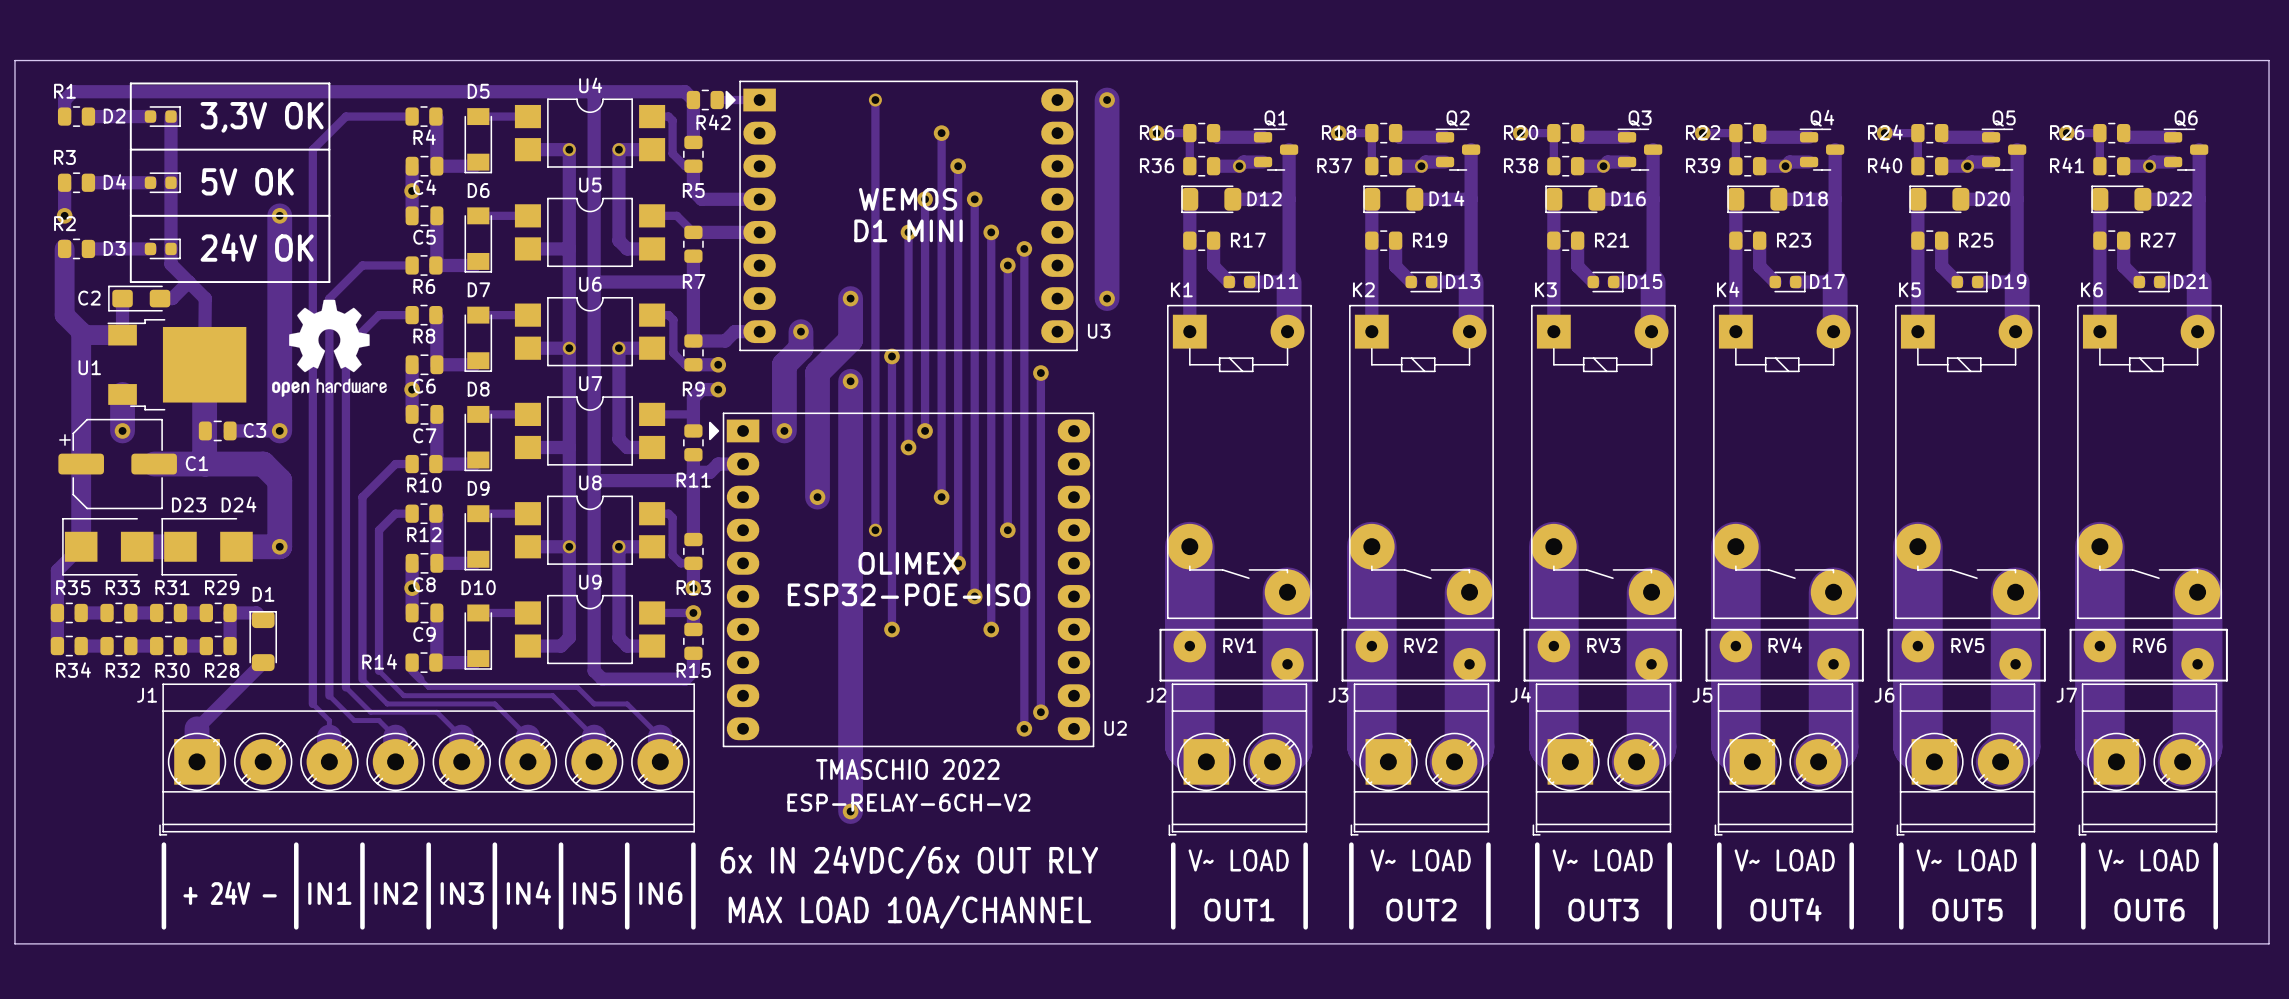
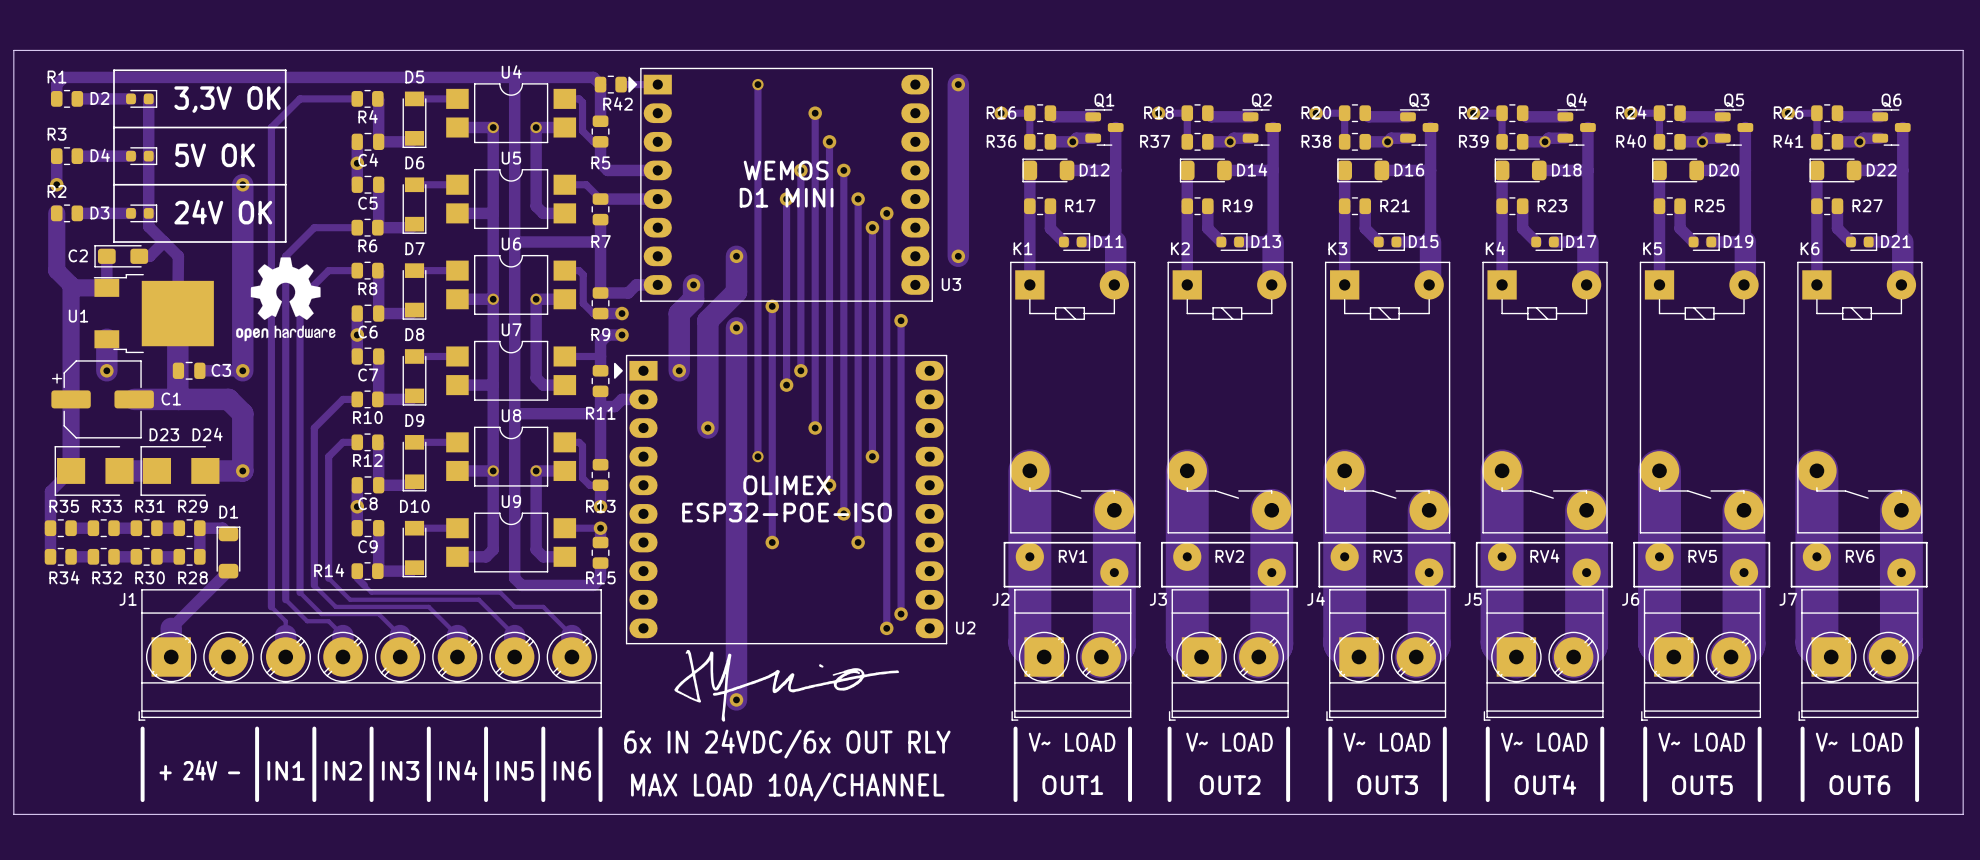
drawing: none -> [674, 649, 900, 722]
text: TMASCHIO 2022 (907, 769) -> none
text: ESP-RELAY-6CH-V2 (908, 802) -> none

